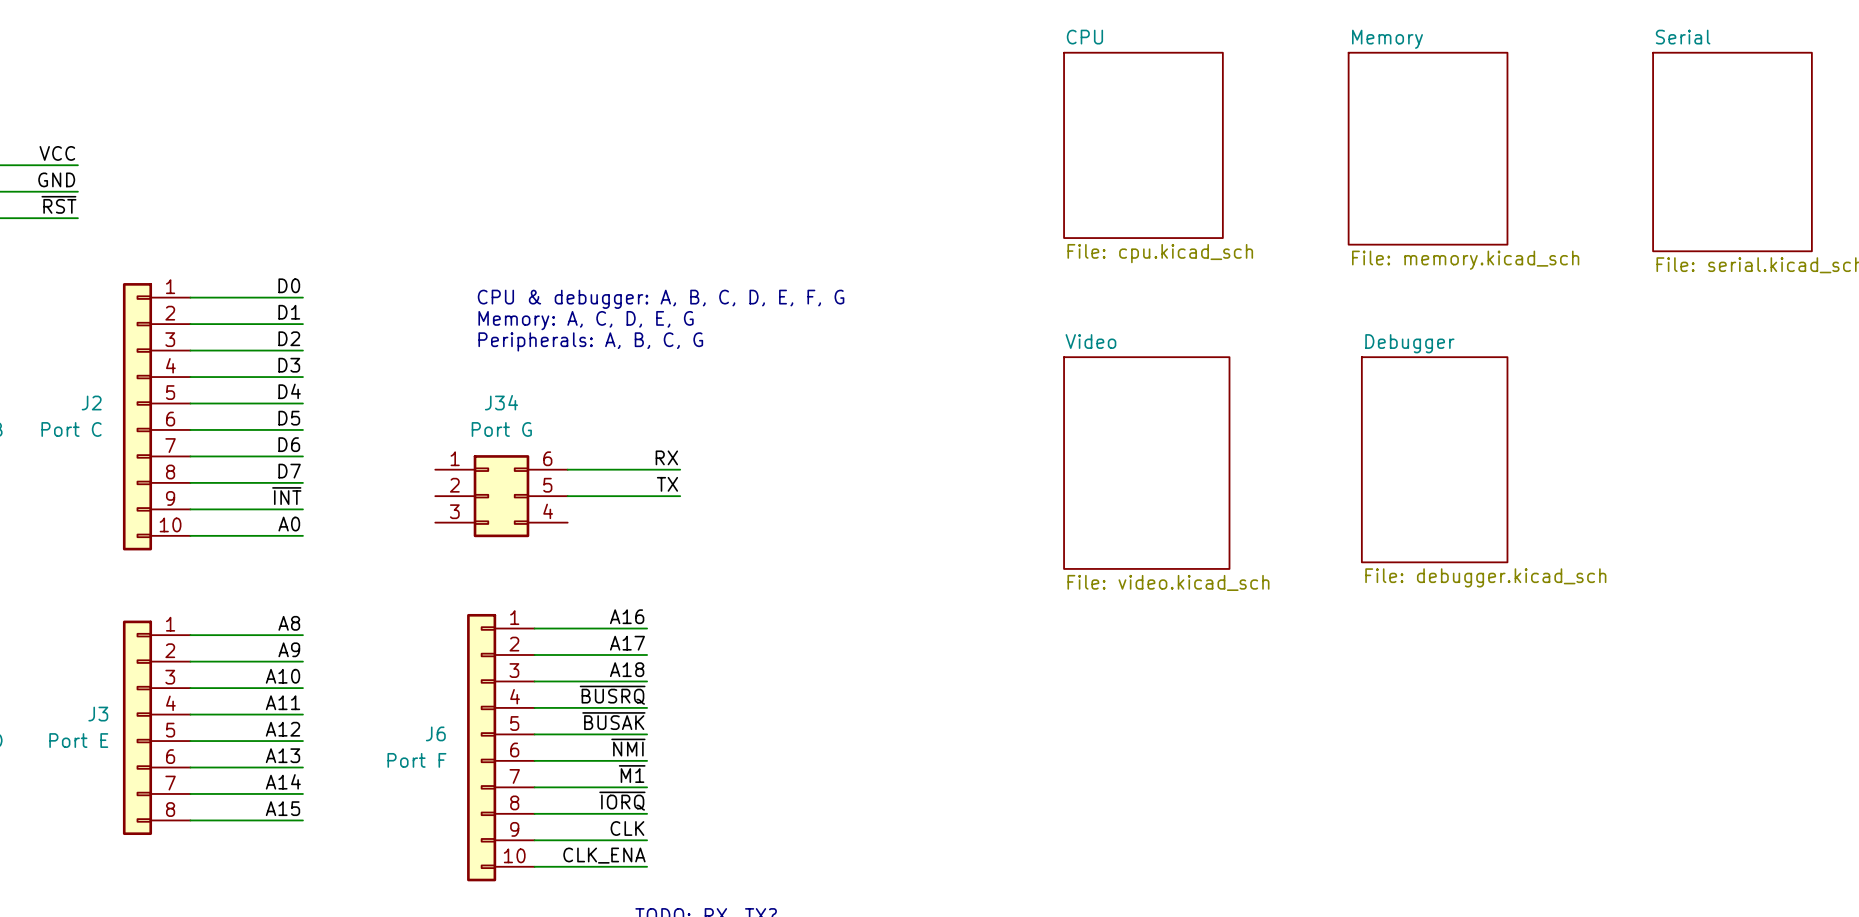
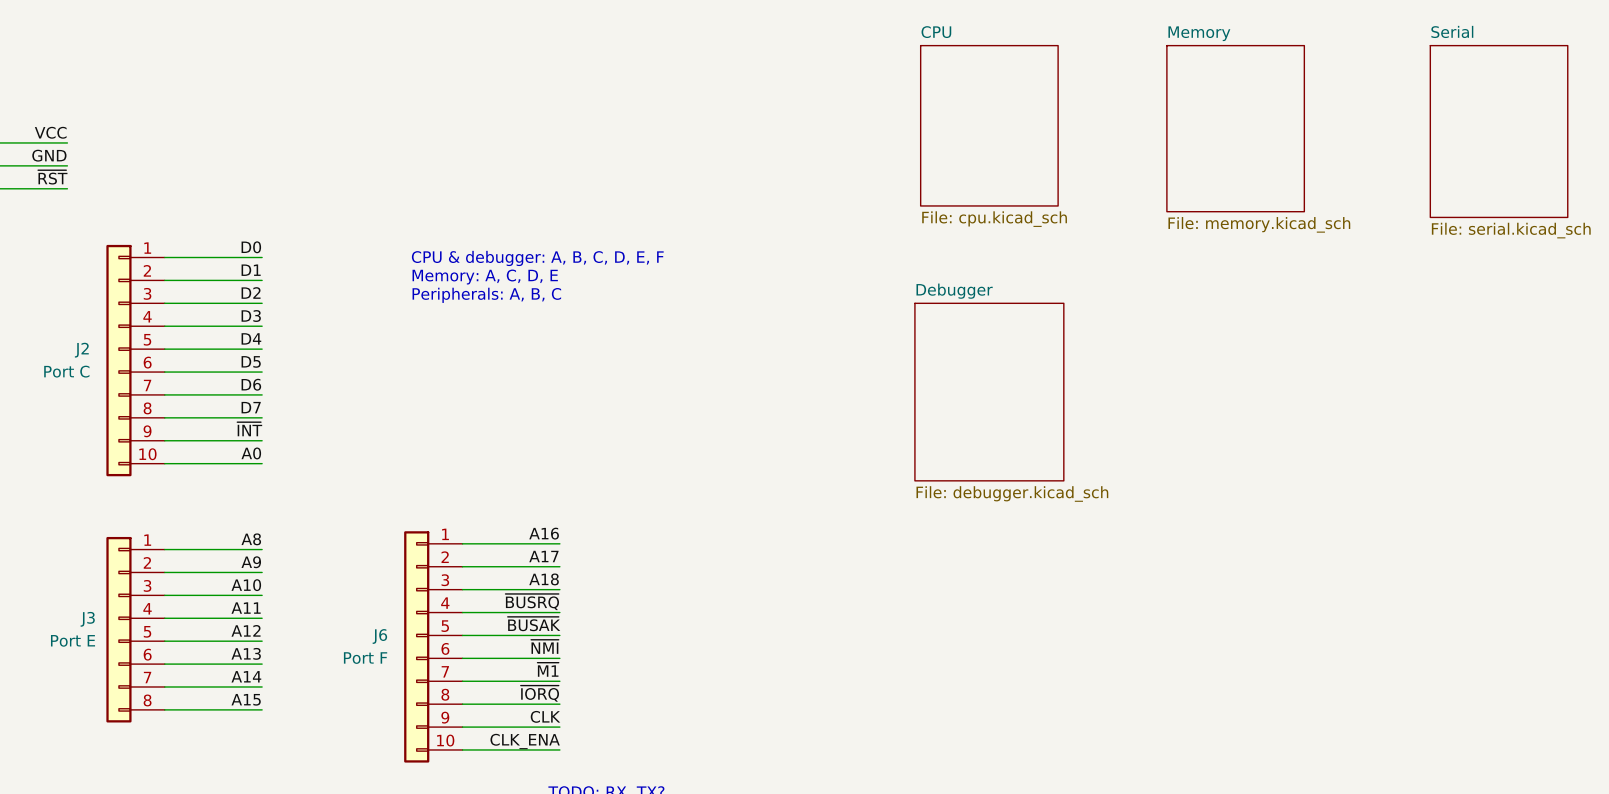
text: CPU & debugger: A, B, C, D, E, F, G (661, 299) -> CPU & debugger: A, B, C, D, E, F (537, 258)
text: Memory: A, C, D, E, G (586, 320) -> Memory: A, C, D, E (485, 277)
text: Peripherals: A, B, C, G (590, 341) -> Peripherals: A, B, C (486, 295)
sheet Debugger: none -> File: debugger.kicad_sch (989, 392)
label: RX (666, 457) -> none
sheet Debugger: File: debugger.kicad_sch (1434, 459) -> none
sheet Video: File: video.kicad_sch (1146, 463) -> none
wire: (567, 469) (680, 469) -> none
label: TX (667, 484) -> none
J34: Port G (501, 496) -> none
wire: (567, 496) (680, 496) -> none

